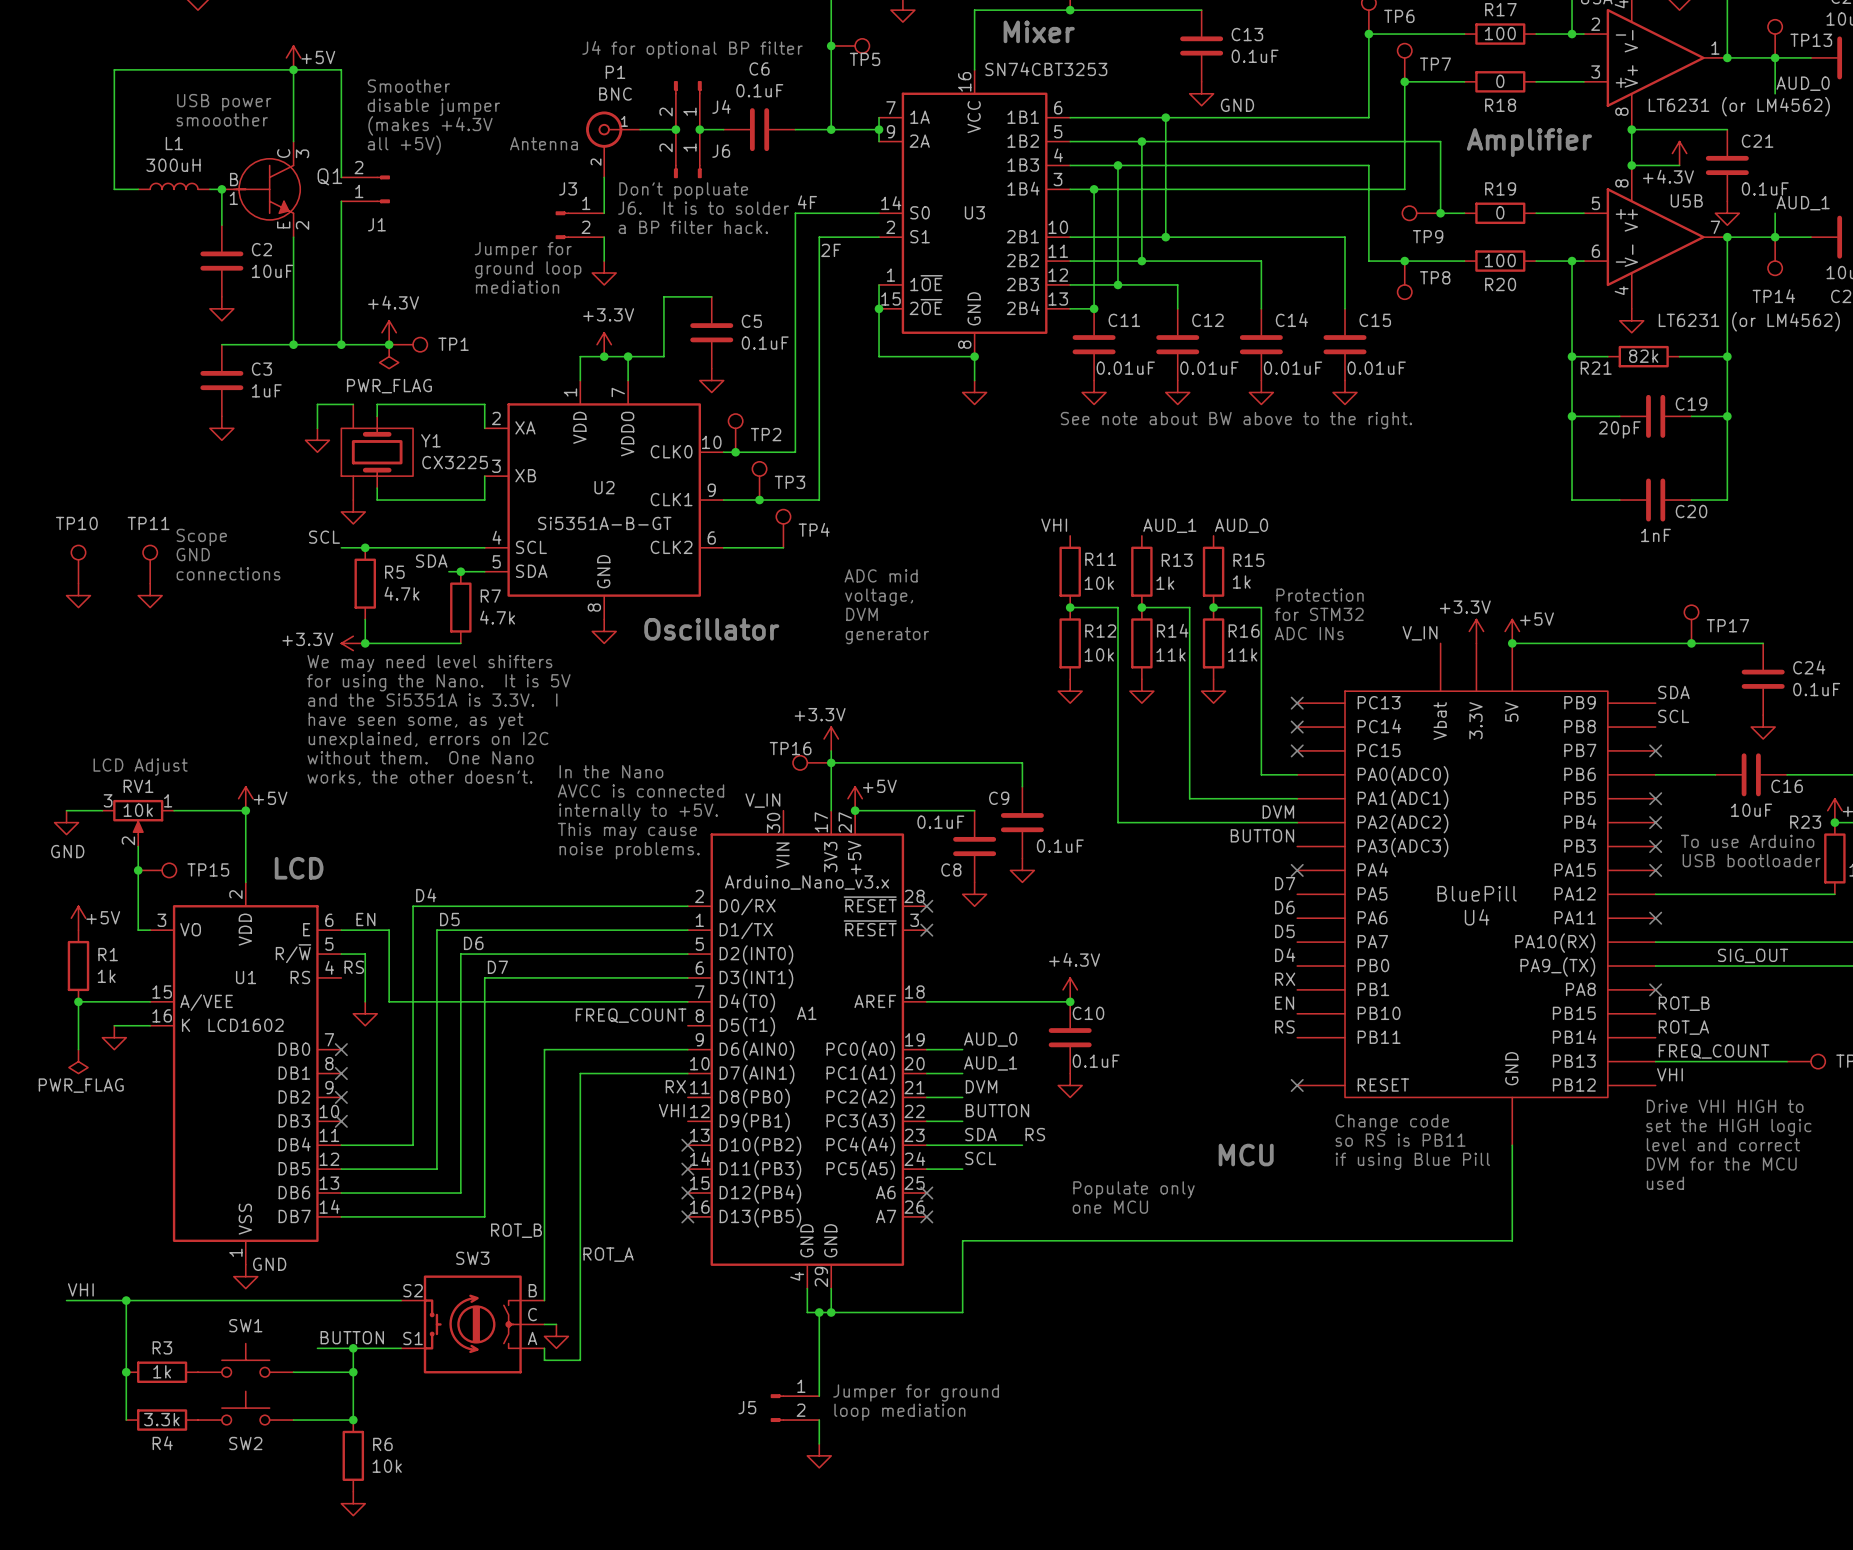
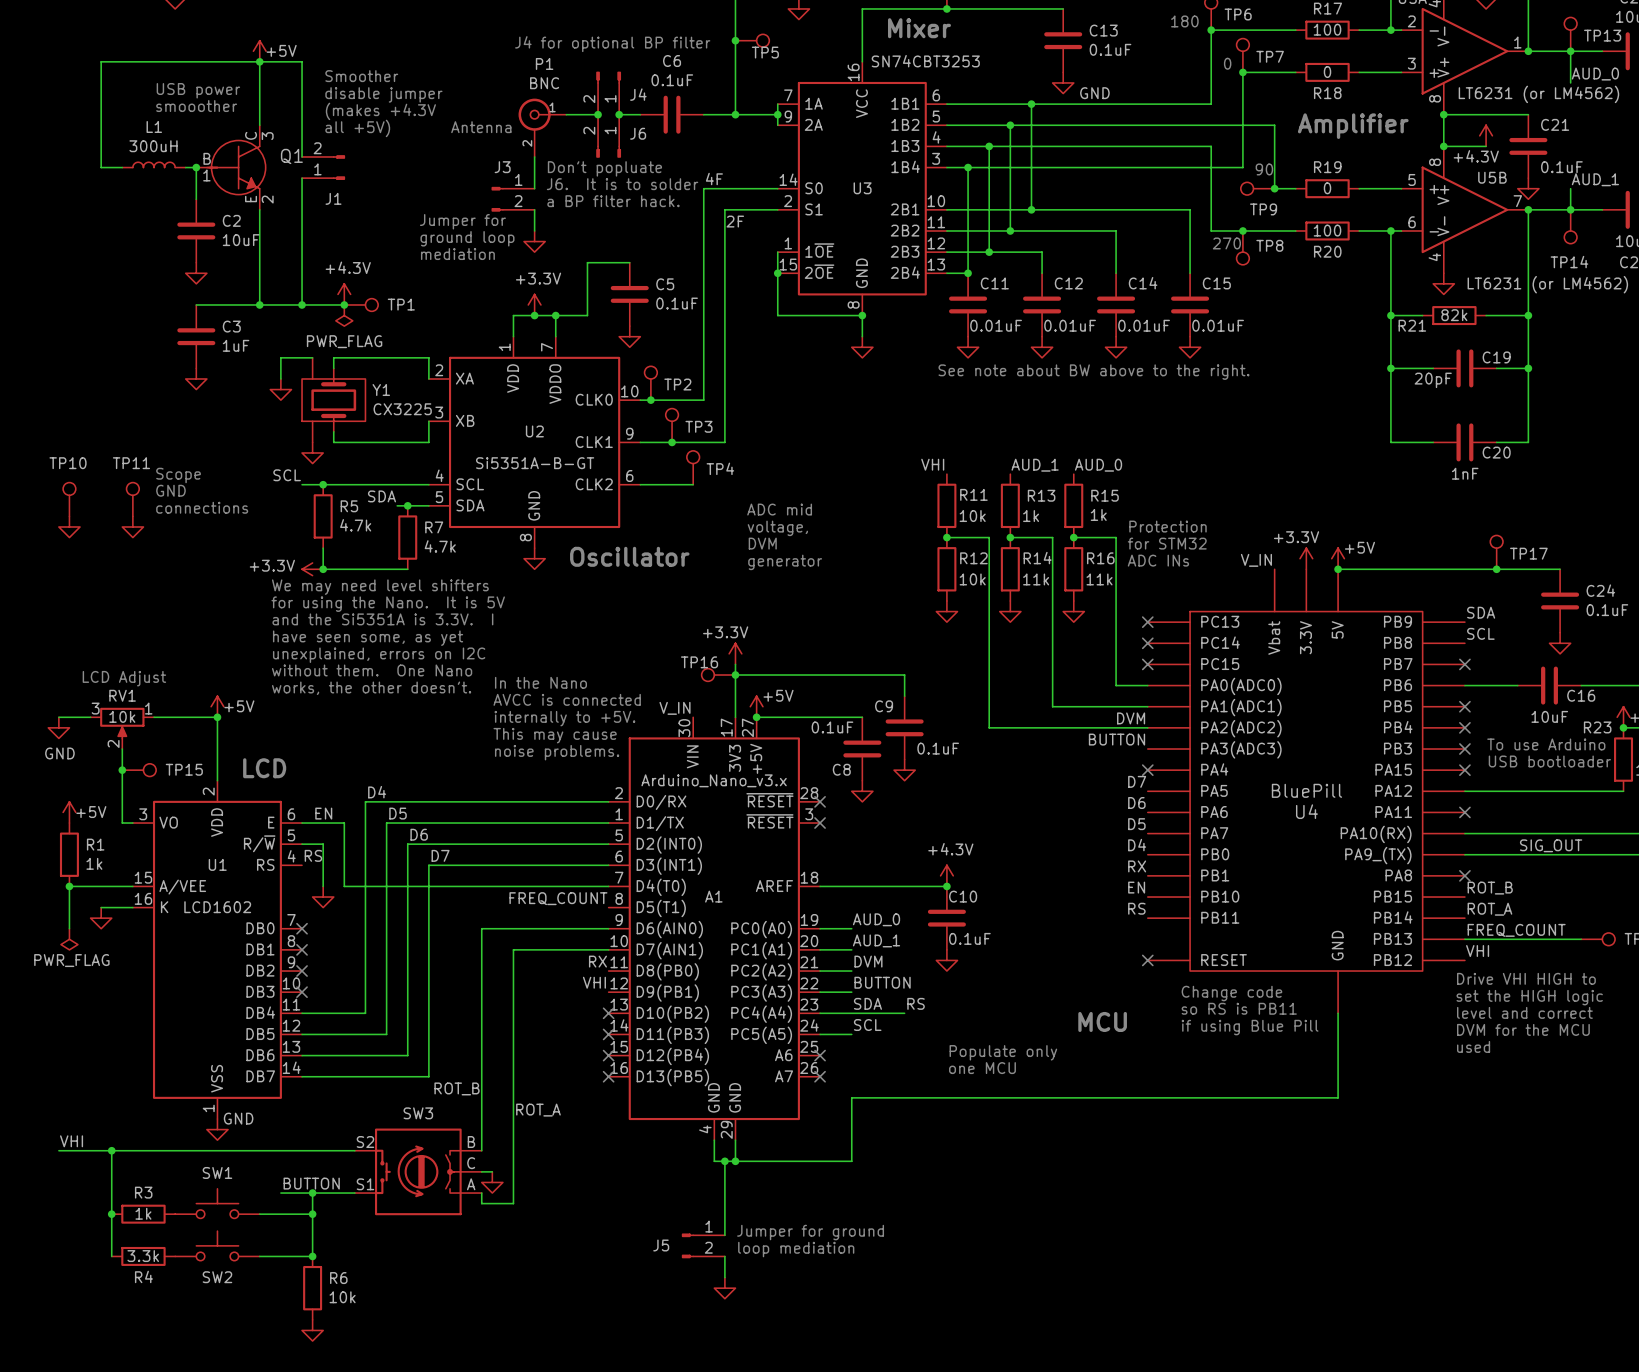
text: none -> 180 (1184, 21)
text: none -> 0 (1227, 63)
text: none -> 90 (1264, 169)
text: none -> 270 (1226, 243)

